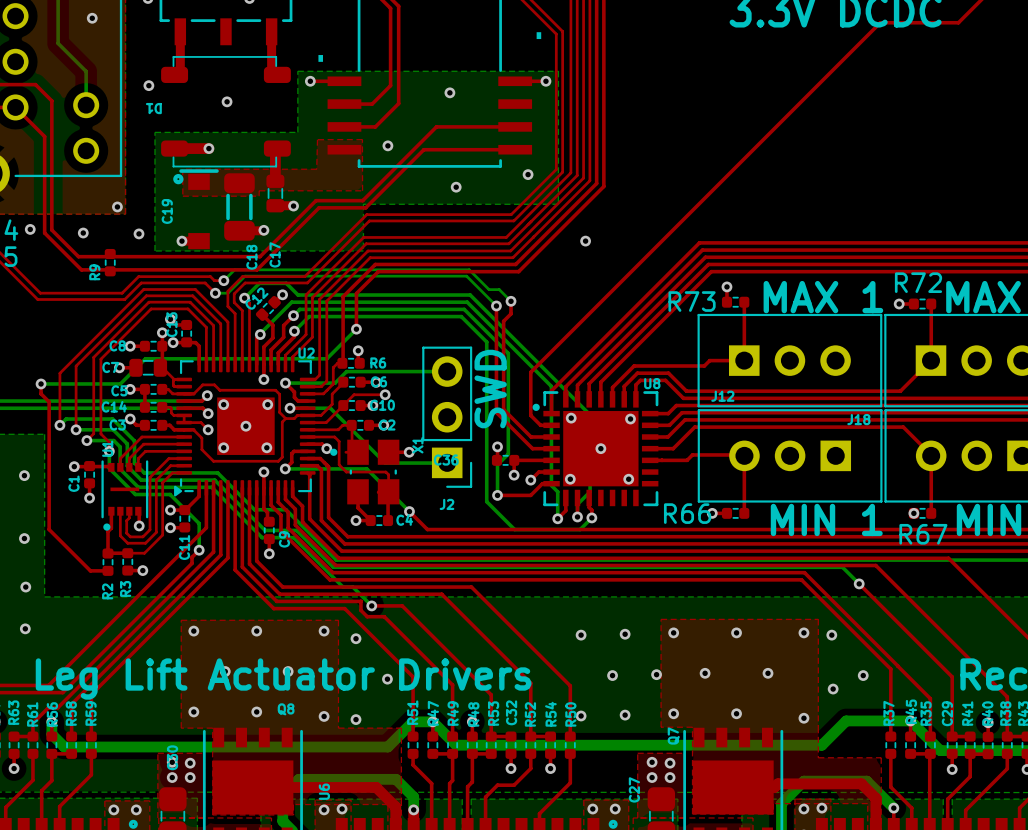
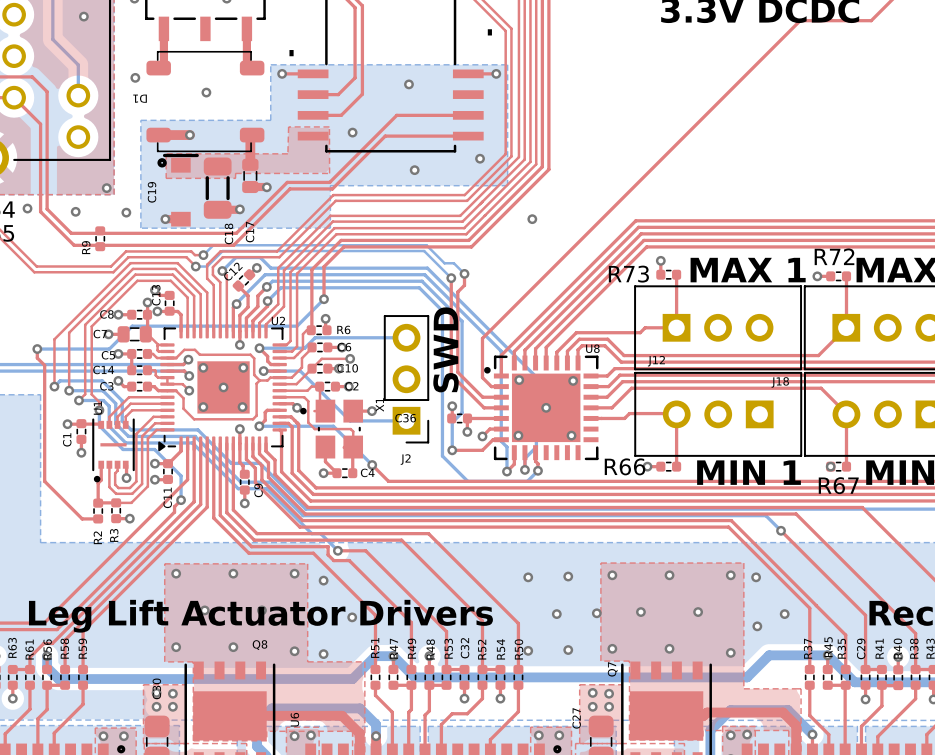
via: (24, 475) -> none
via: (24, 538) -> none
via: (25, 587) -> none
via: (25, 628) -> none

